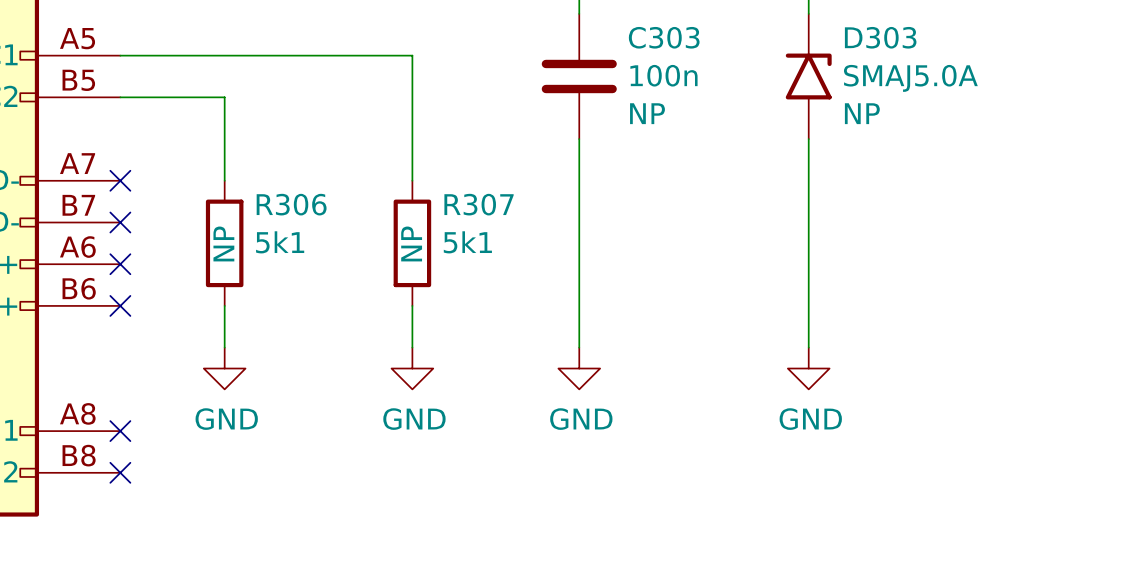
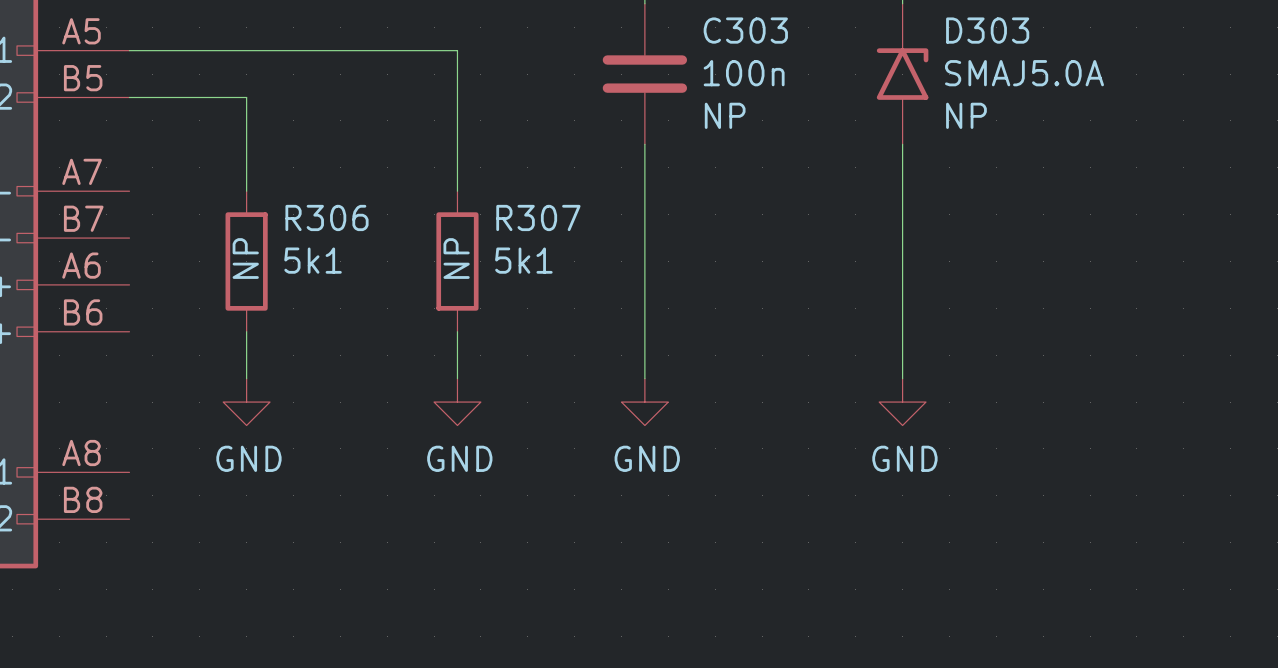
no-connect mark: (120, 180) -> none
no-connect mark: (120, 222) -> none
no-connect mark: (120, 264) -> none
no-connect mark: (120, 305) -> none
no-connect mark: (120, 431) -> none
no-connect mark: (120, 472) -> none

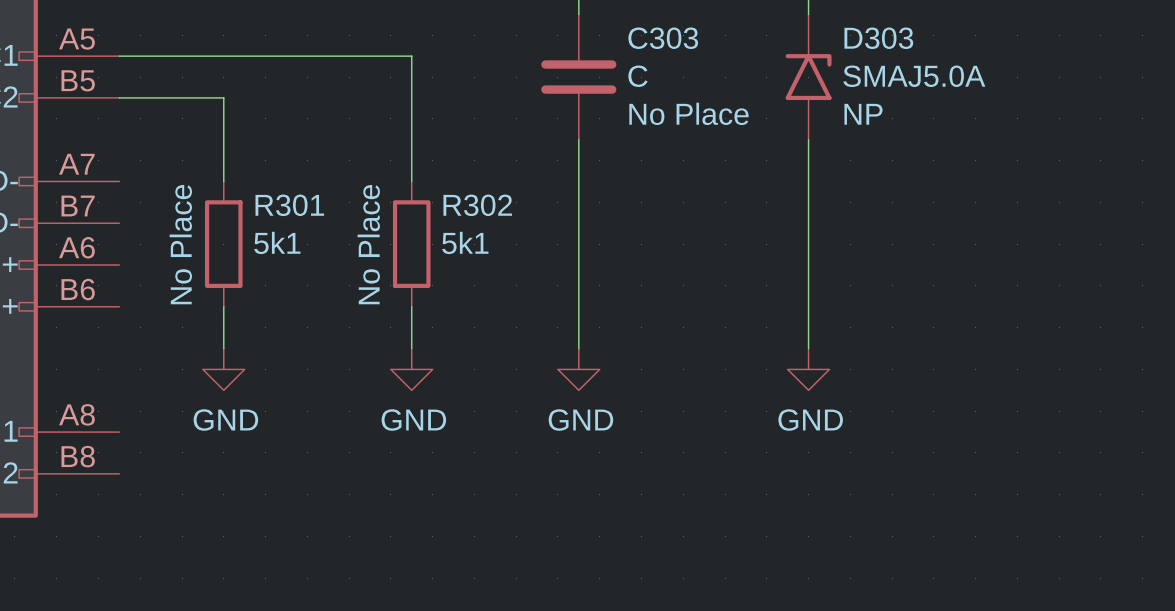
C303 value: 100n (744, 73) -> C (638, 76)
C303 text: NP (725, 115) -> No Place (689, 113)
R306 name: R306 (327, 217) -> R301 (289, 205)
R307 name: R307 (538, 217) -> R302 (477, 205)
R306 text: NP (245, 258) -> No Place (180, 244)
R307 text: NP (456, 258) -> No Place (368, 244)

